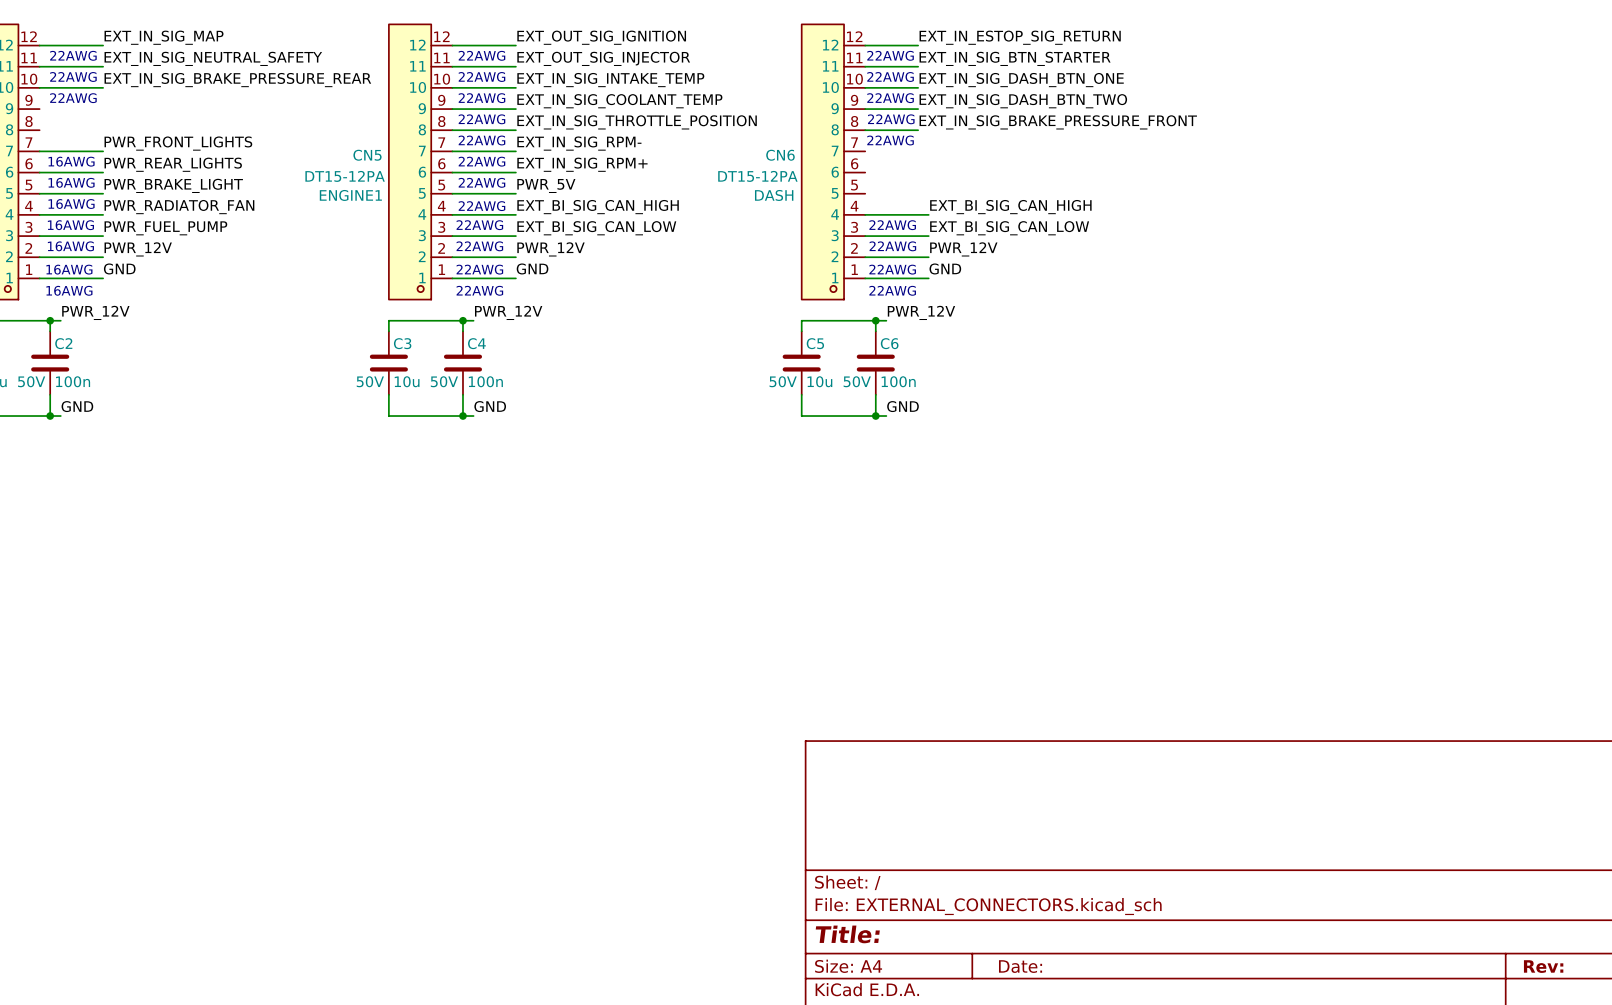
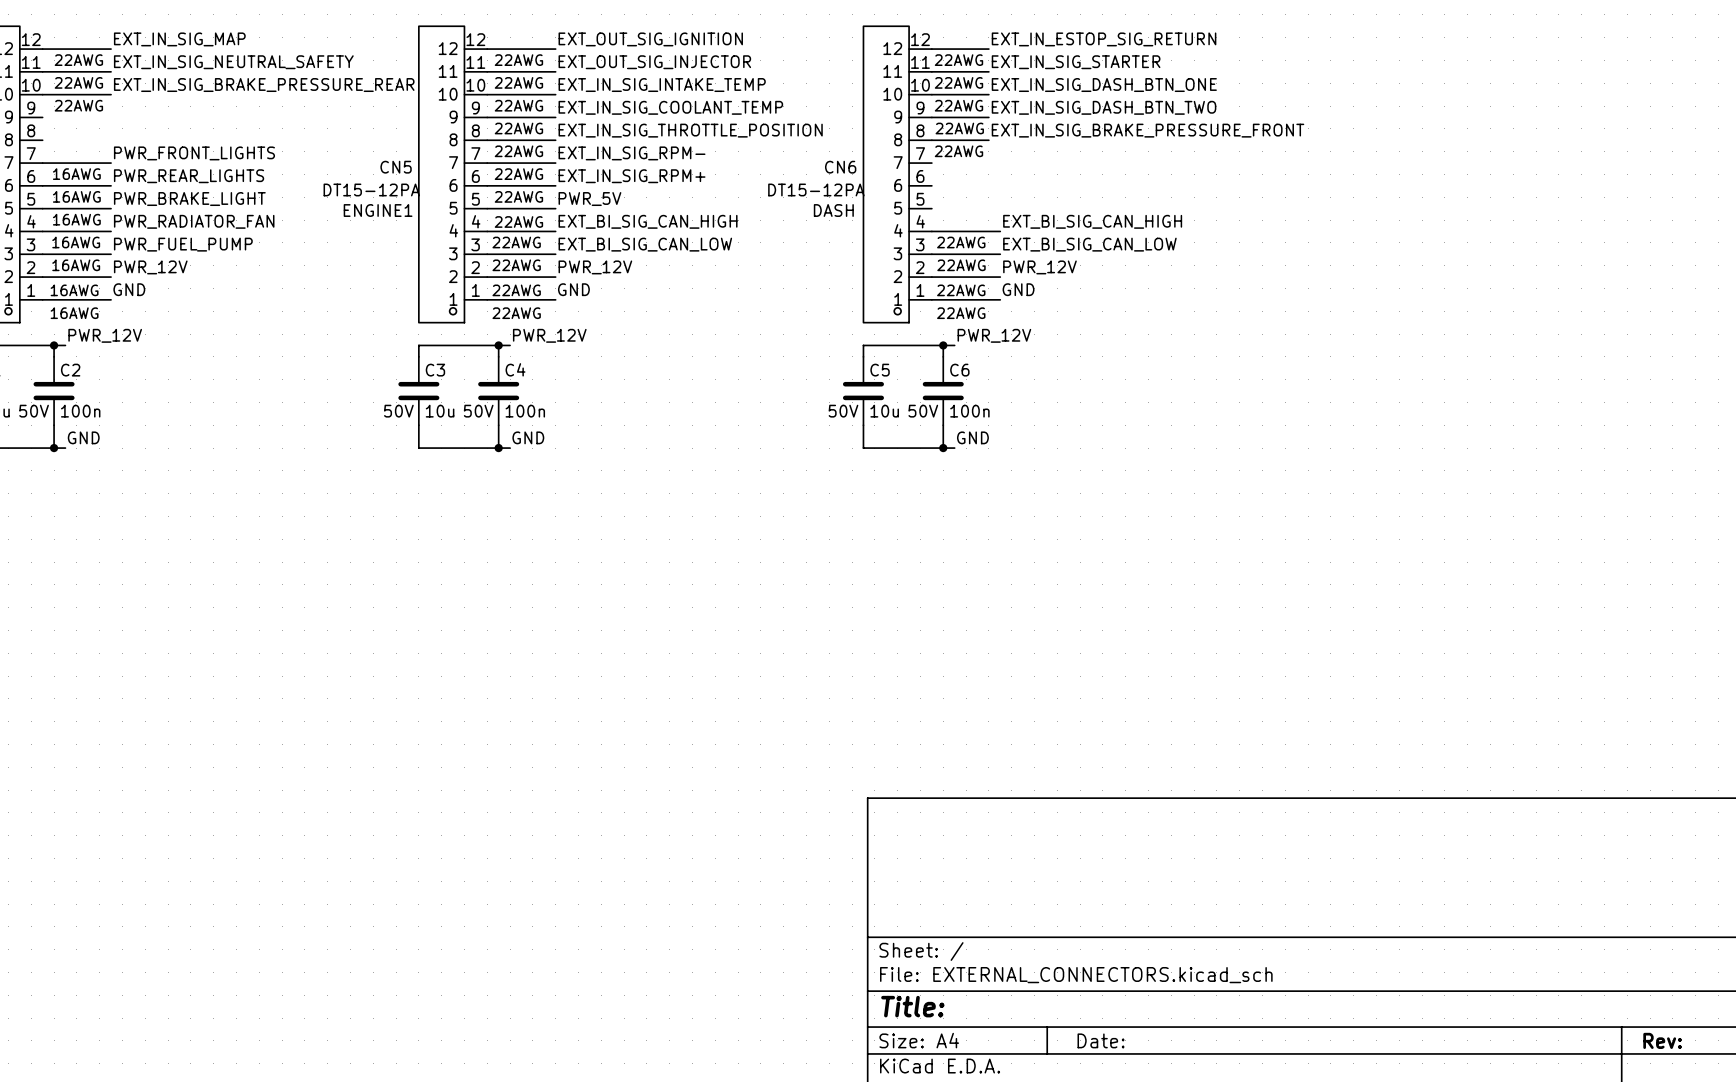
label: EXT_IN_SIG_BTN_STARTER (1015, 58) -> EXT_IN_SIG_STARTER (1076, 62)

